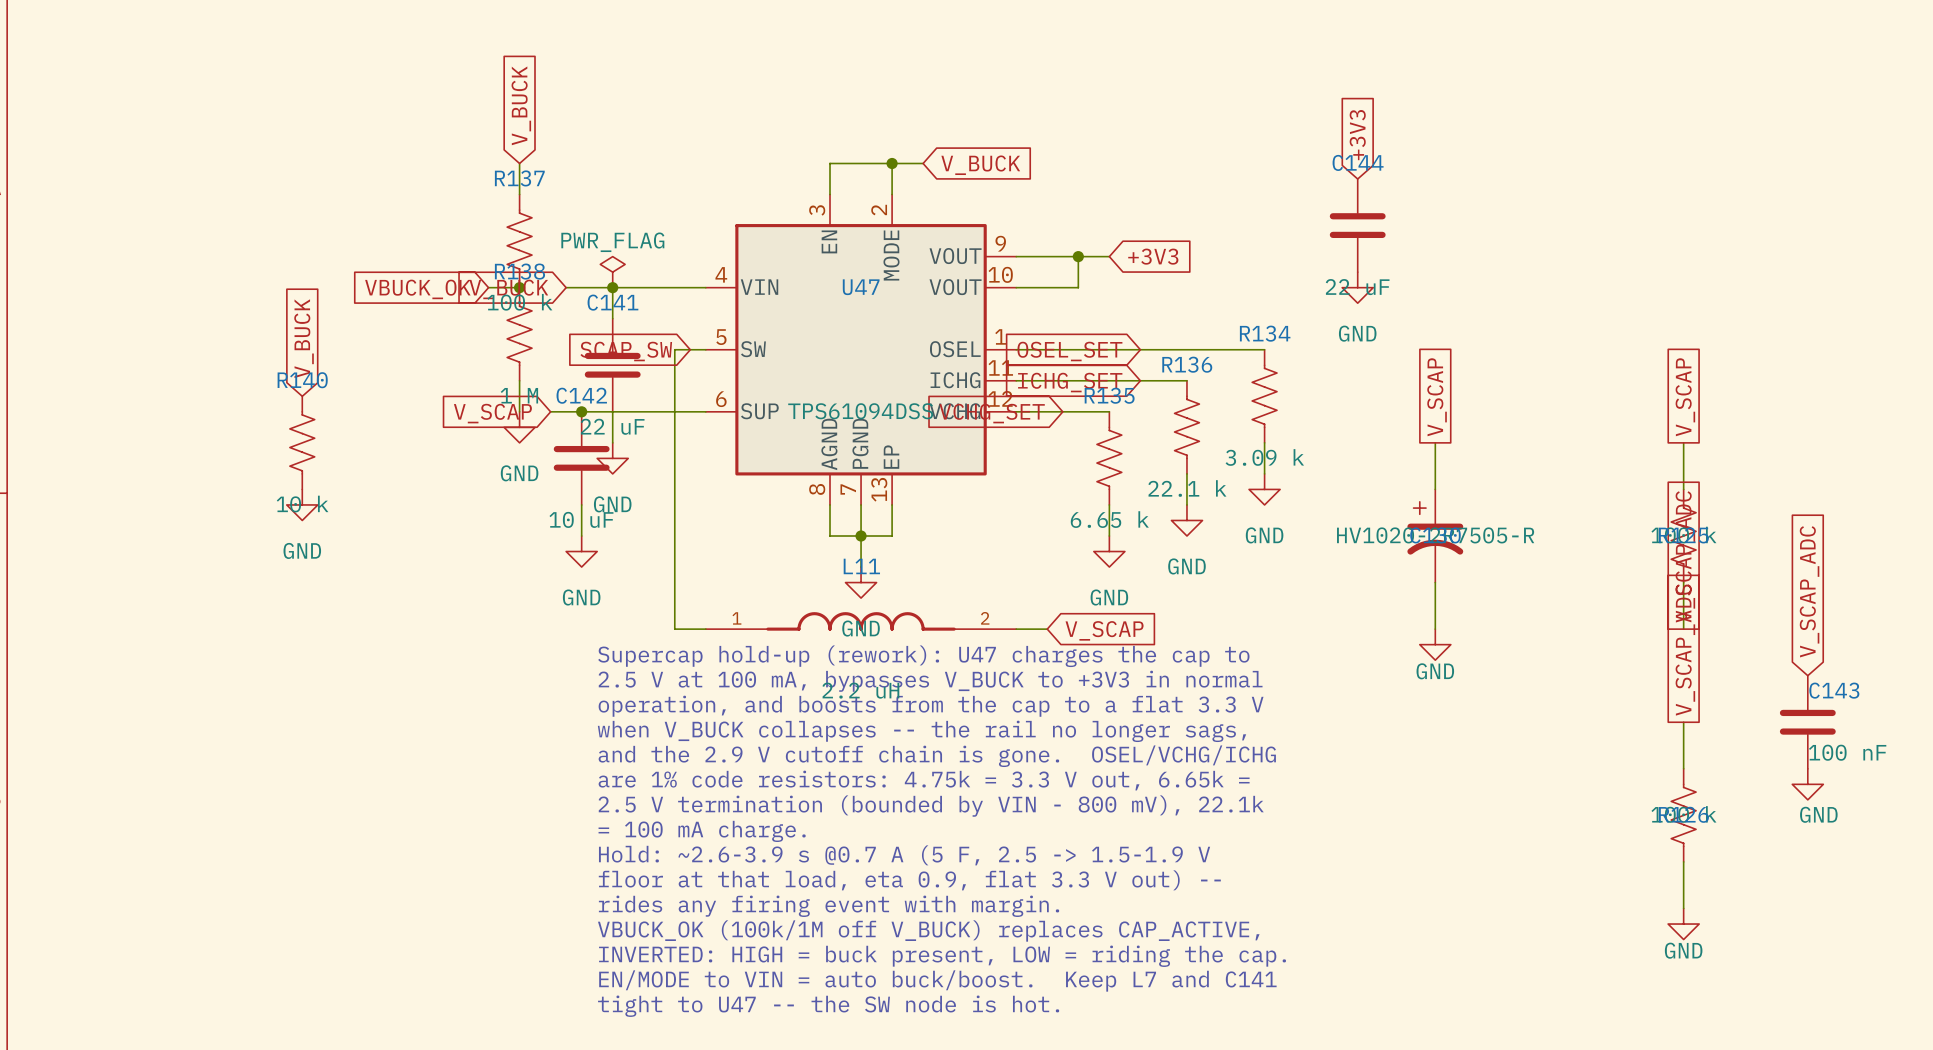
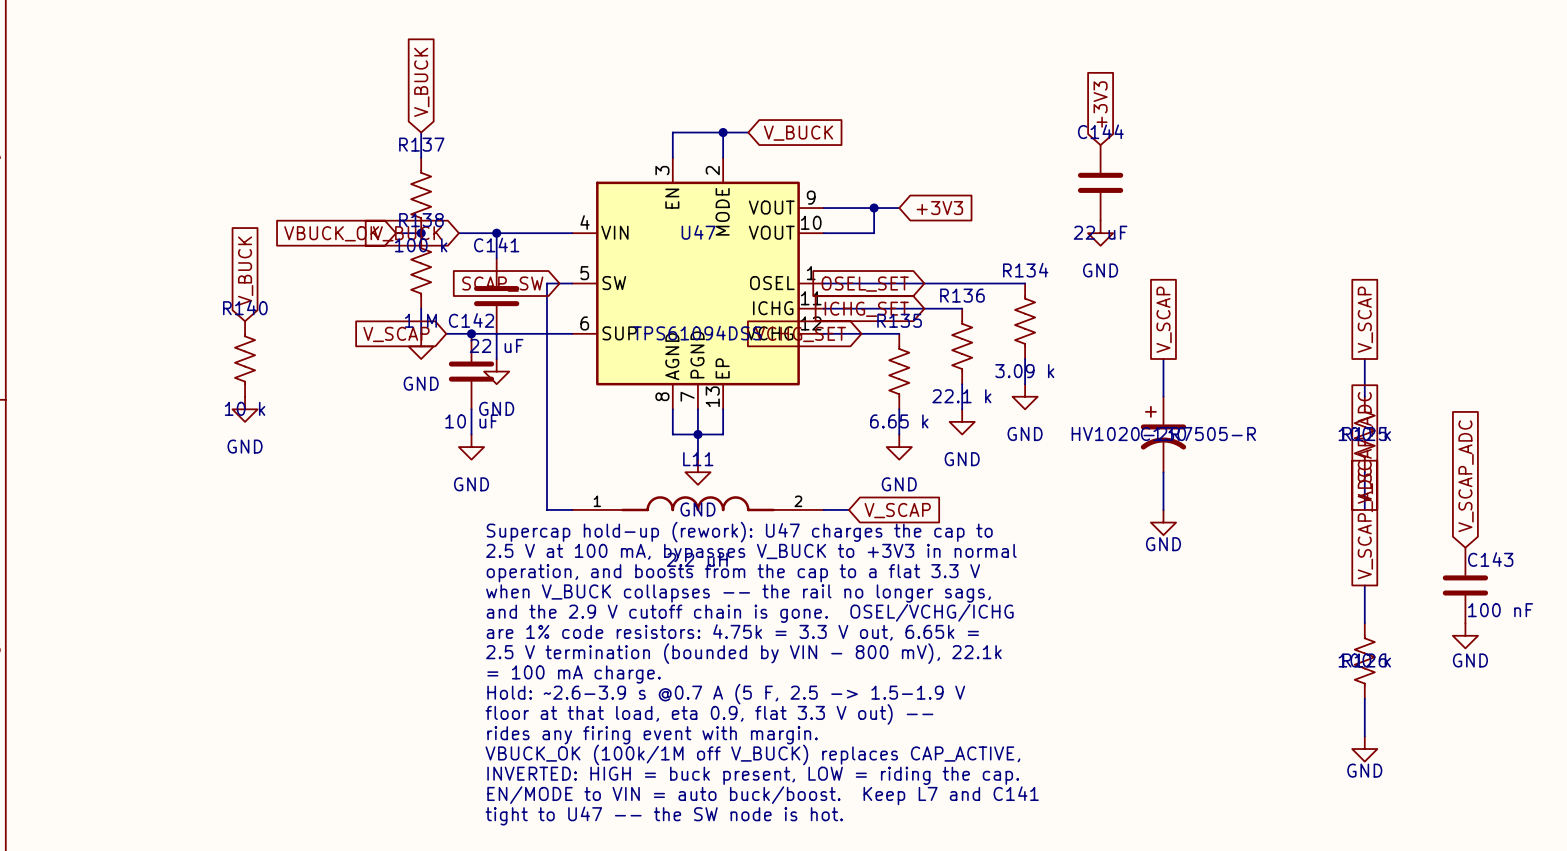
power symbol: PWR_FLAG (612, 272) -> none

